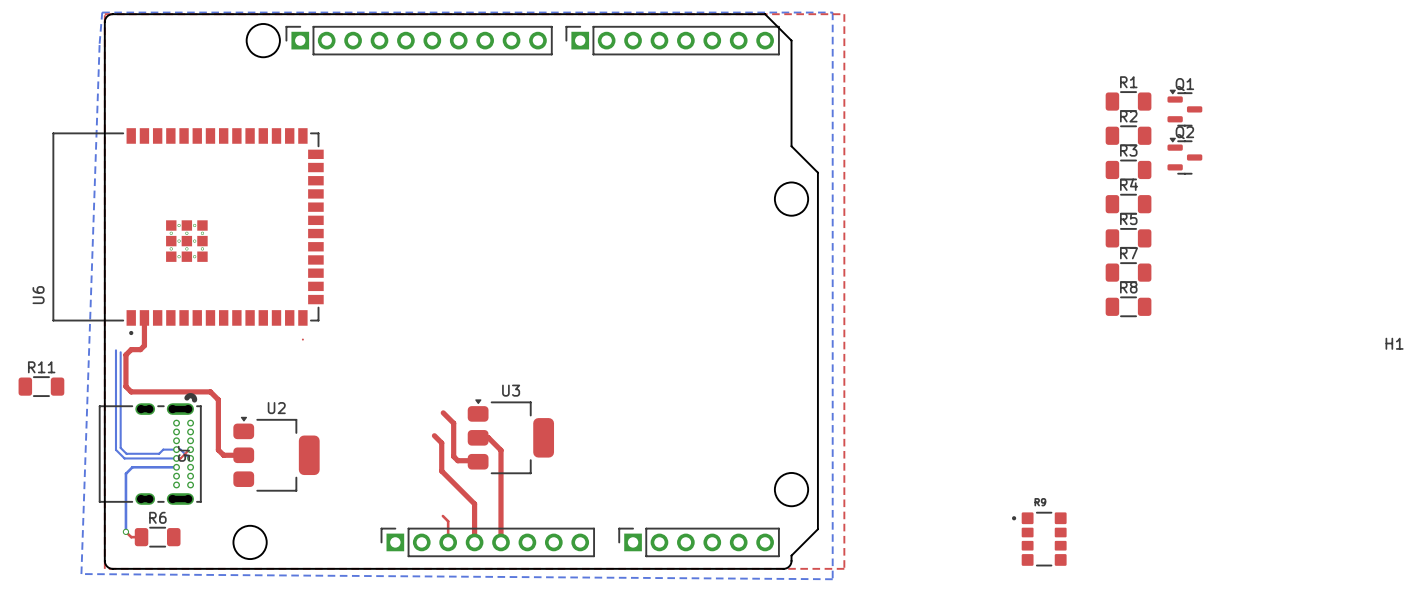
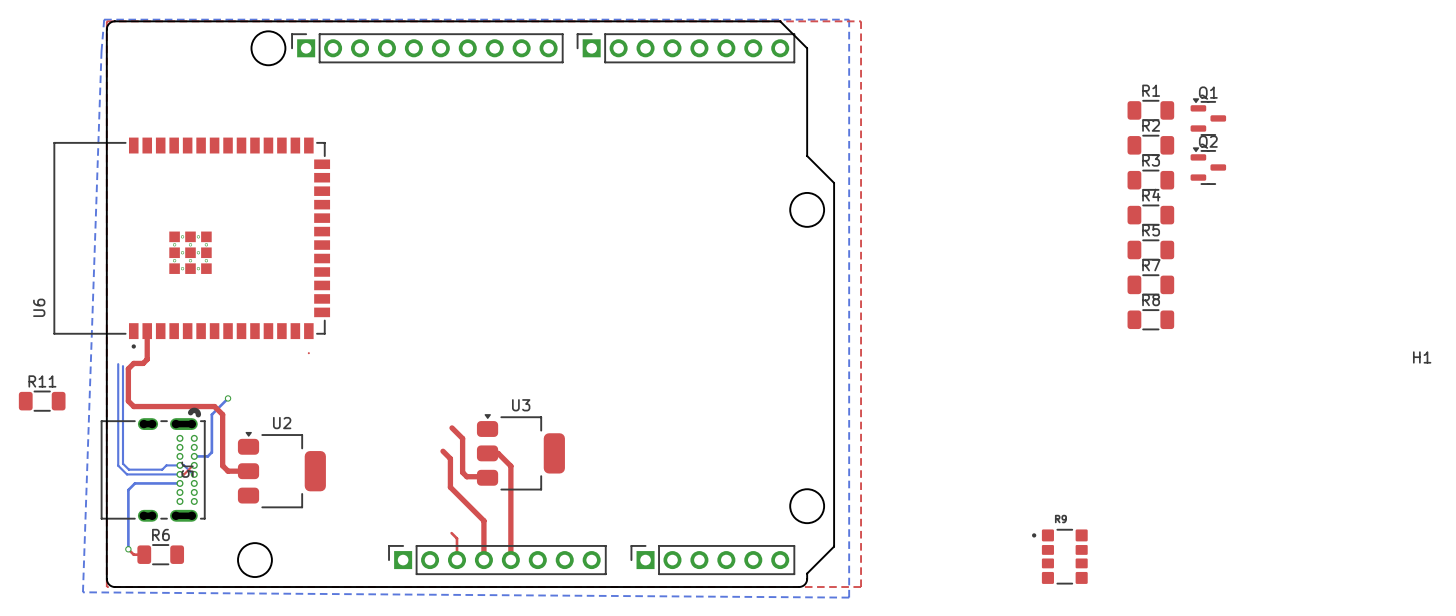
bottom track: none -> (228, 398) (211, 414) (211, 452) (207, 456) (194, 456)
via: none -> (228, 398)

